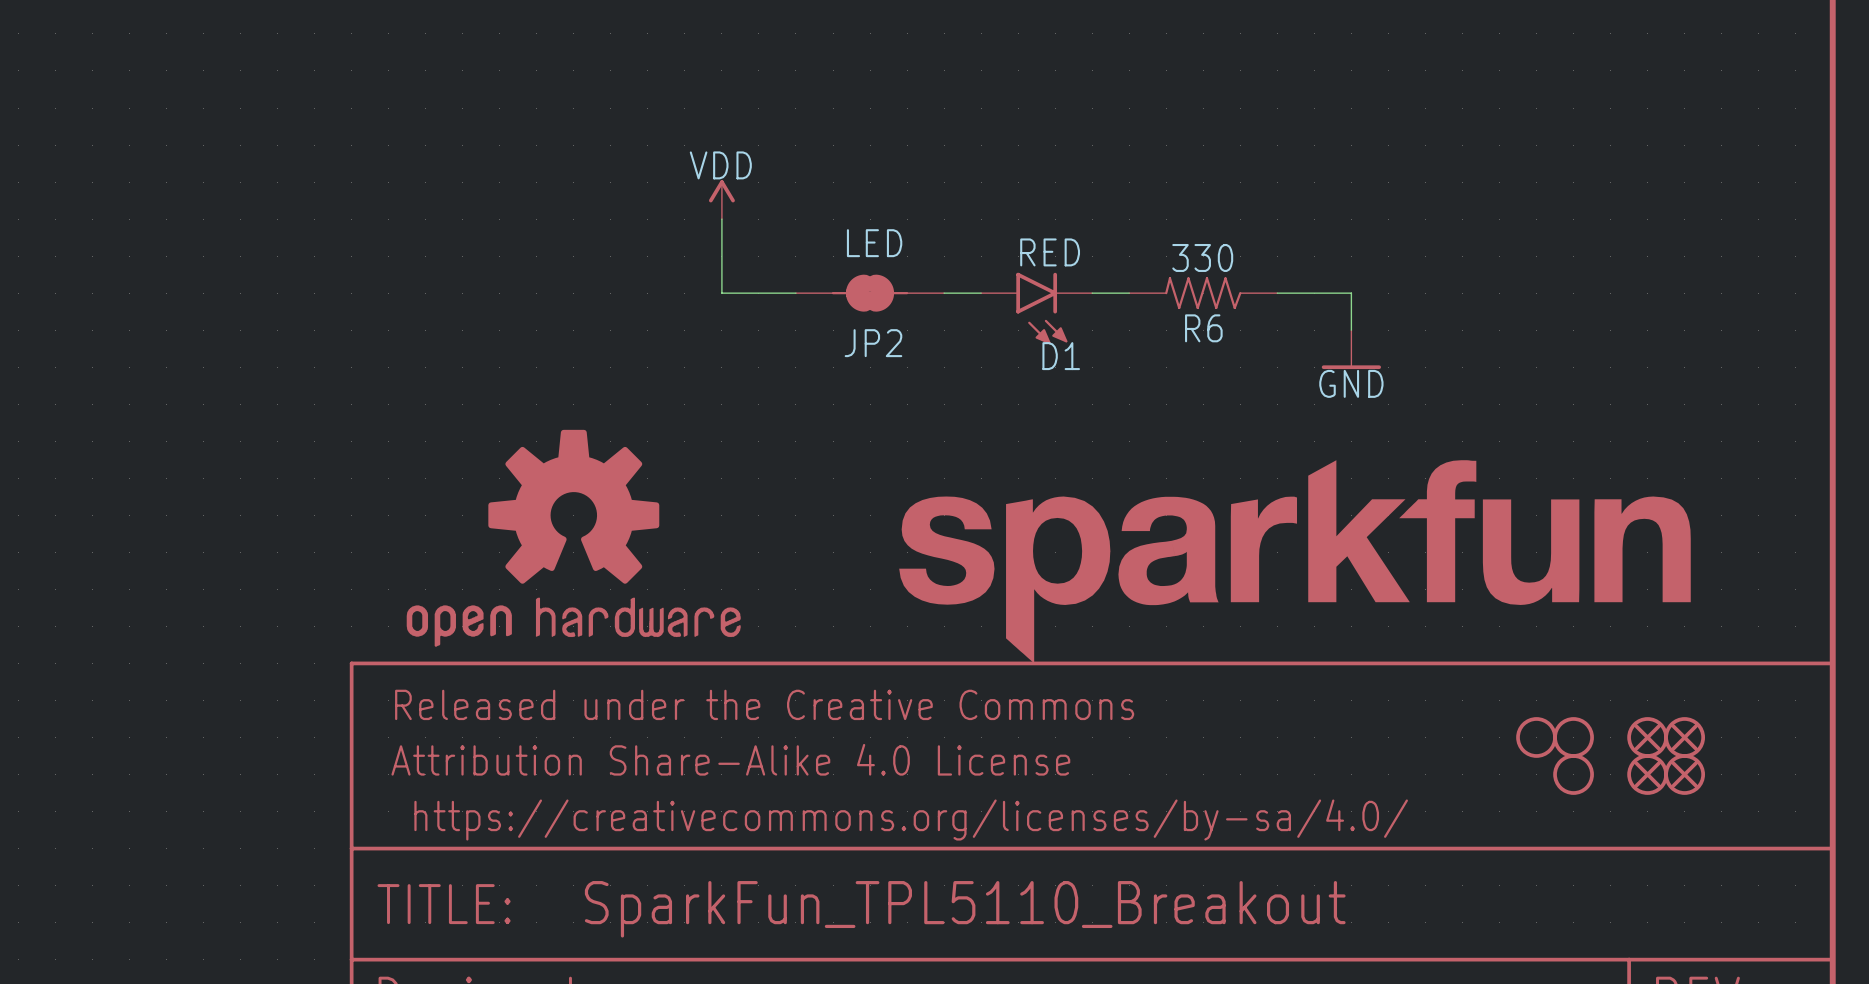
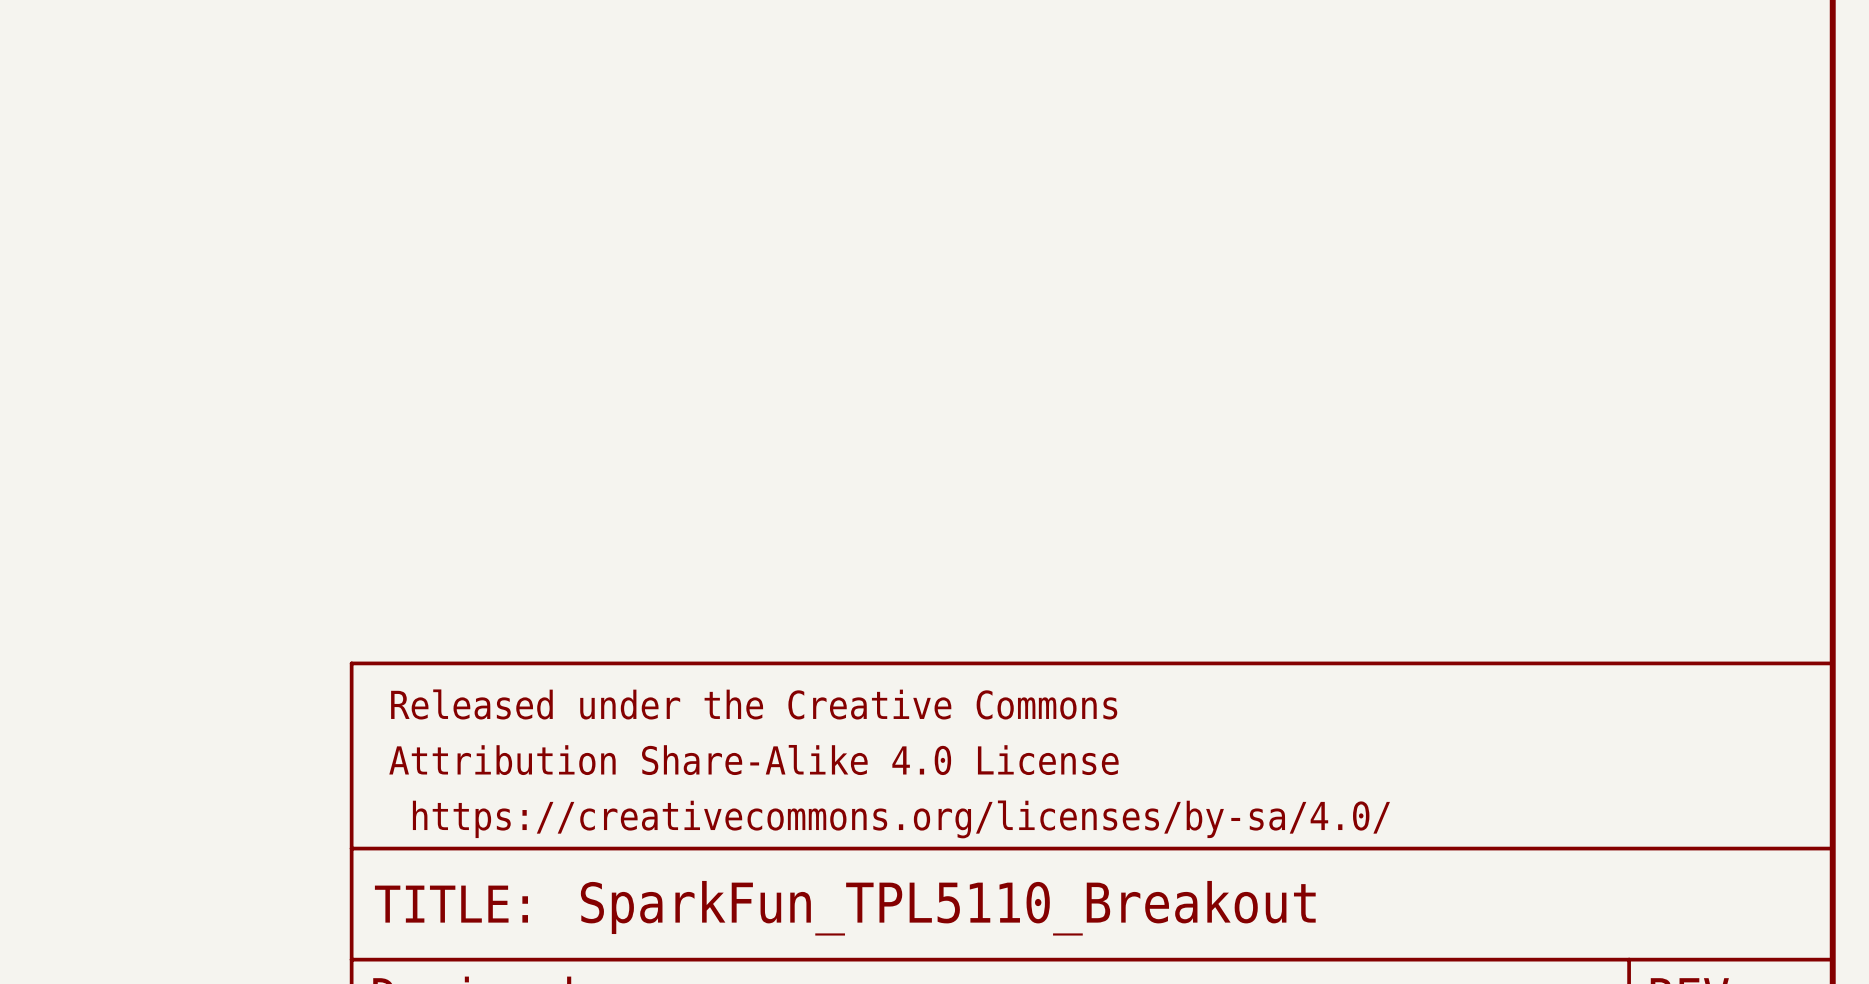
power symbol: VDD (721, 199) -> none
wire: (721, 219) (721, 293) (795, 293) -> none
JP2: LED (870, 293) -> none
wire: (944, 293) (981, 293) -> none
wire: (1092, 293) (1129, 293) -> none
R6: 330 (1203, 293) -> none
wire: (1277, 293) (1351, 293) (1351, 330) -> none
D1: RED (1036, 308) -> none
power symbol: GND (1351, 349) -> none
part: (573, 538) -> none
part: (1294, 561) -> none
part: (1536, 737) -> none
part: (1573, 737) -> none
part: (1647, 737) -> none
part: (1684, 737) -> none
part: (1573, 774) -> none
part: (1647, 774) -> none
part: (1684, 774) -> none

